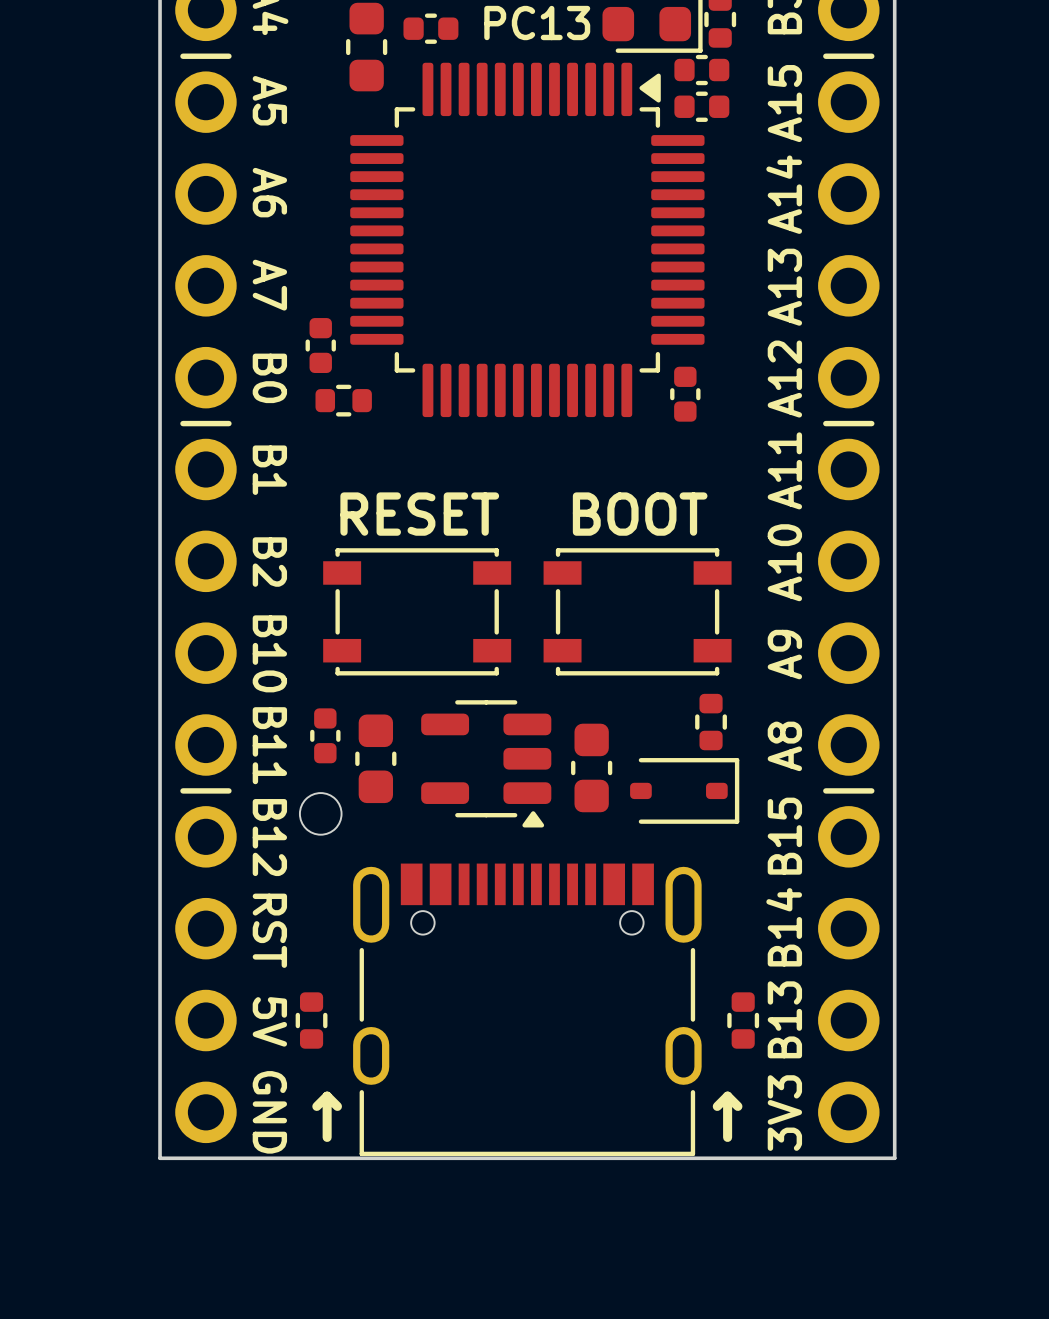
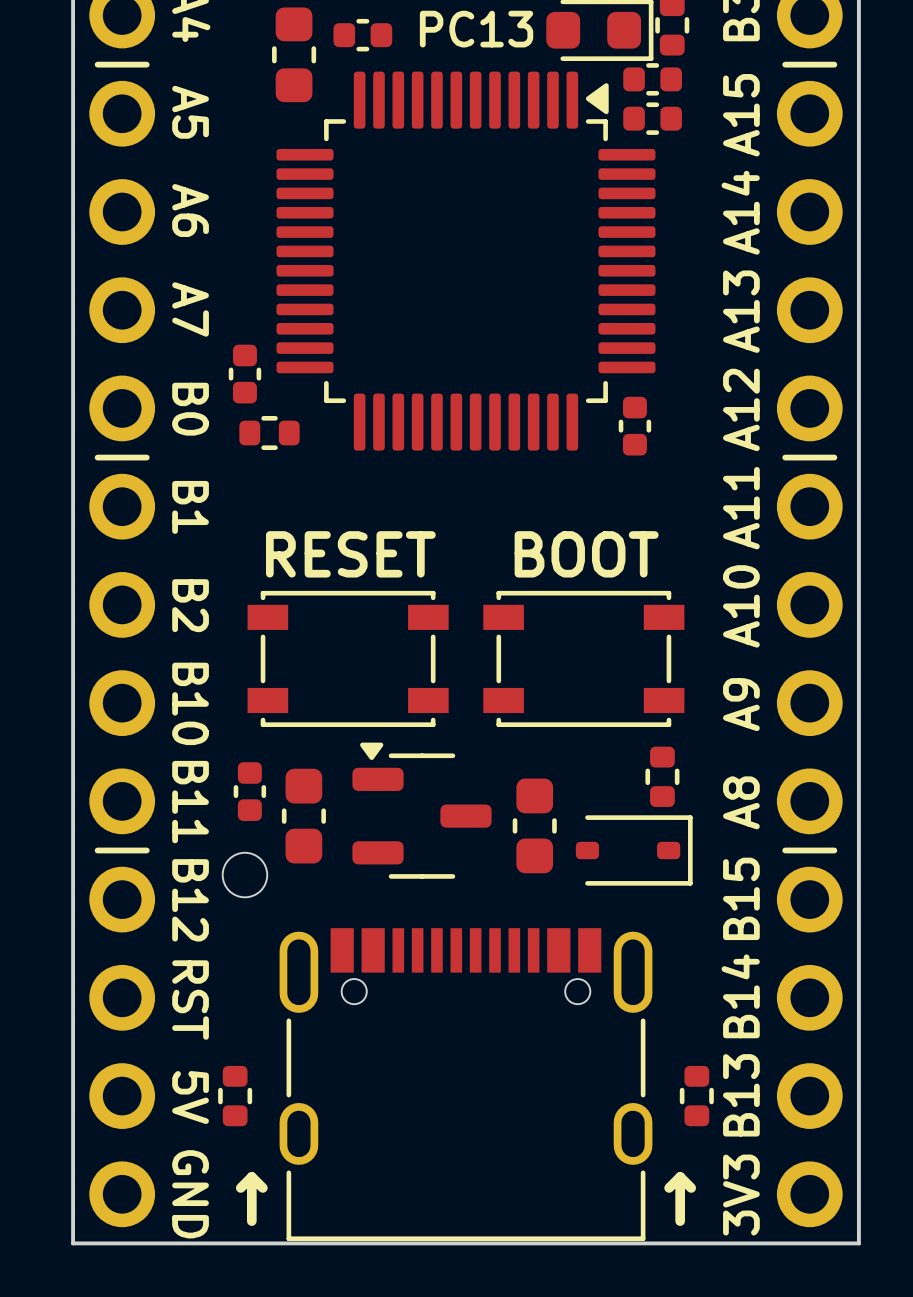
part footprint: [421, 700, 552, 828] -> [352, 742, 492, 879]

